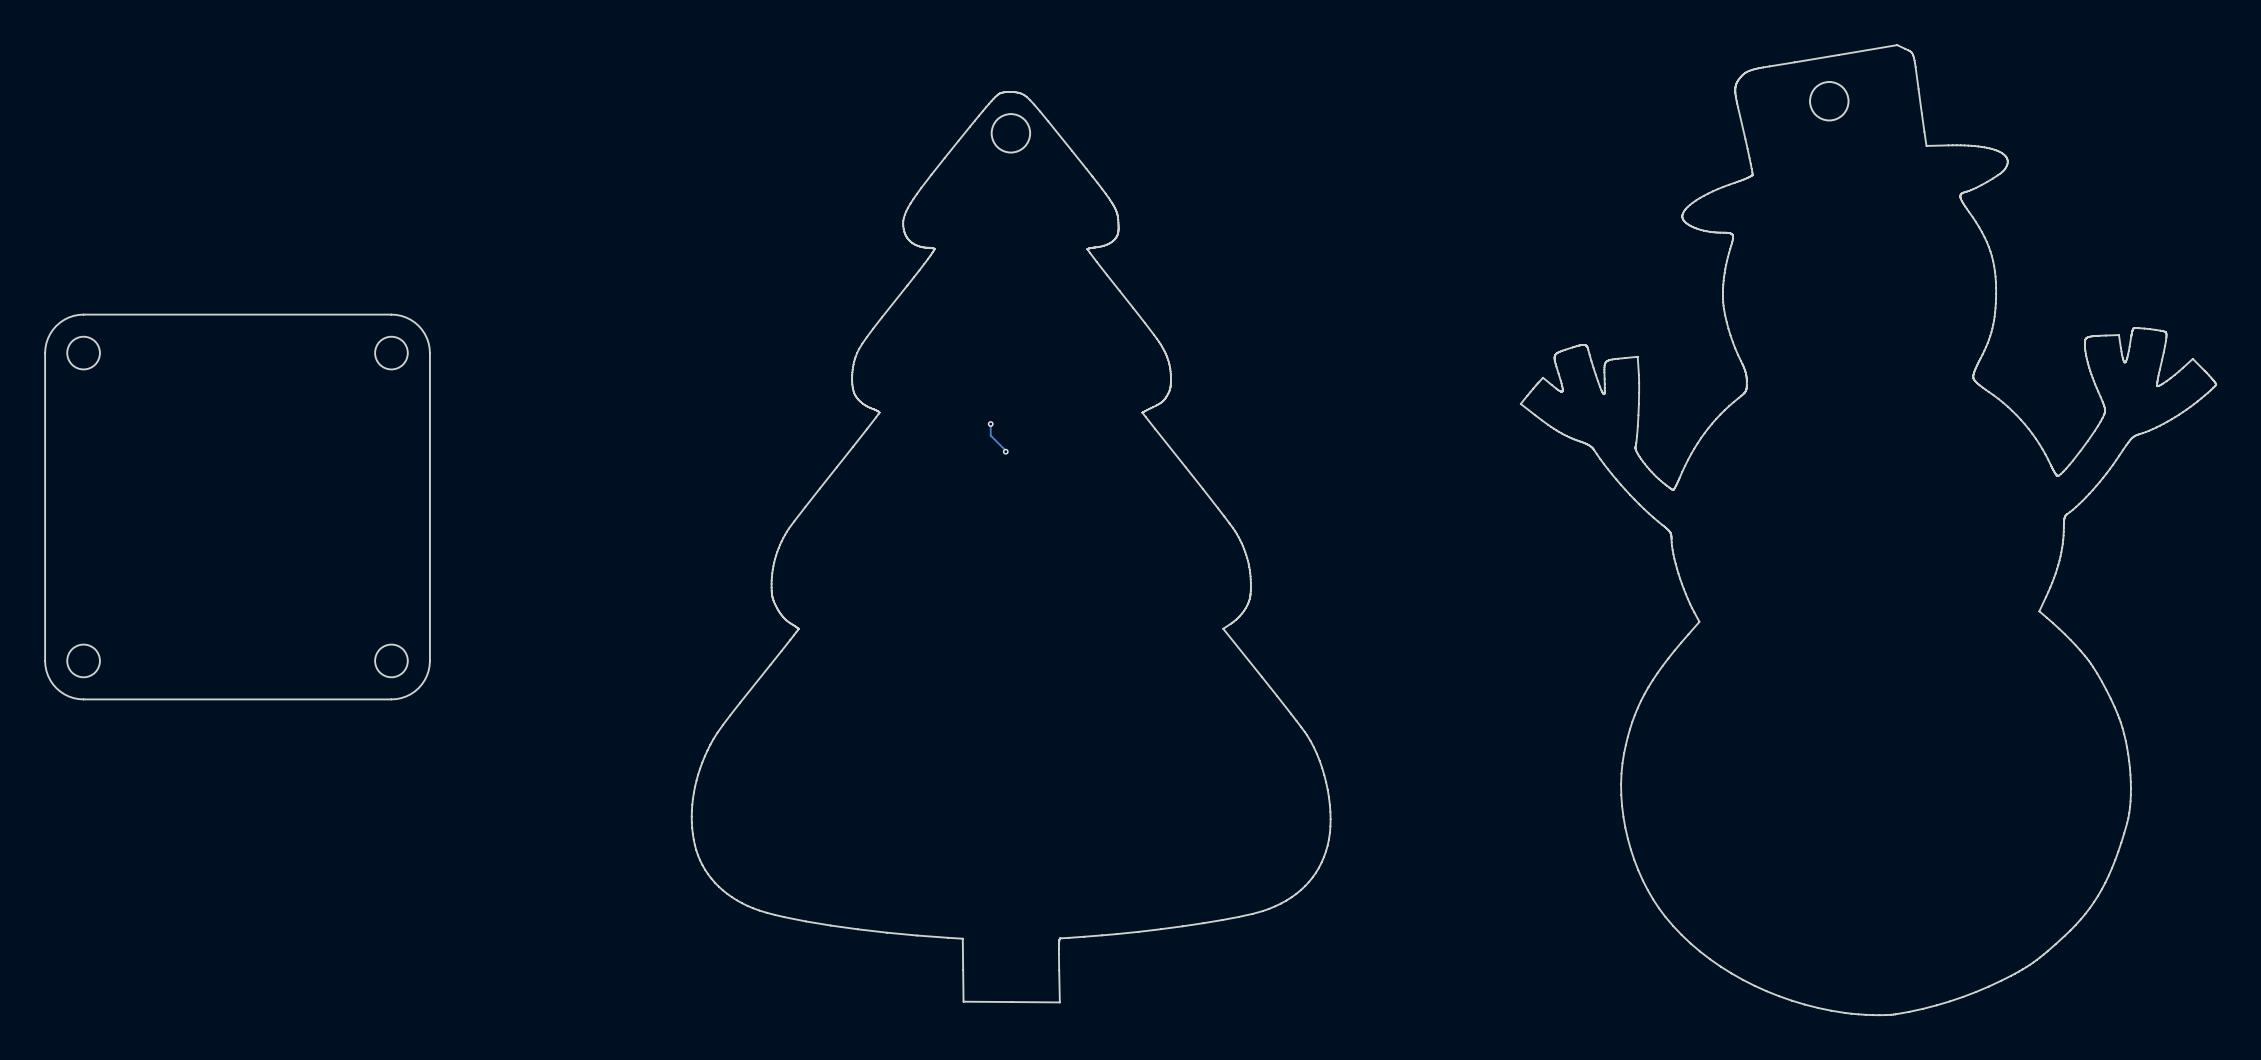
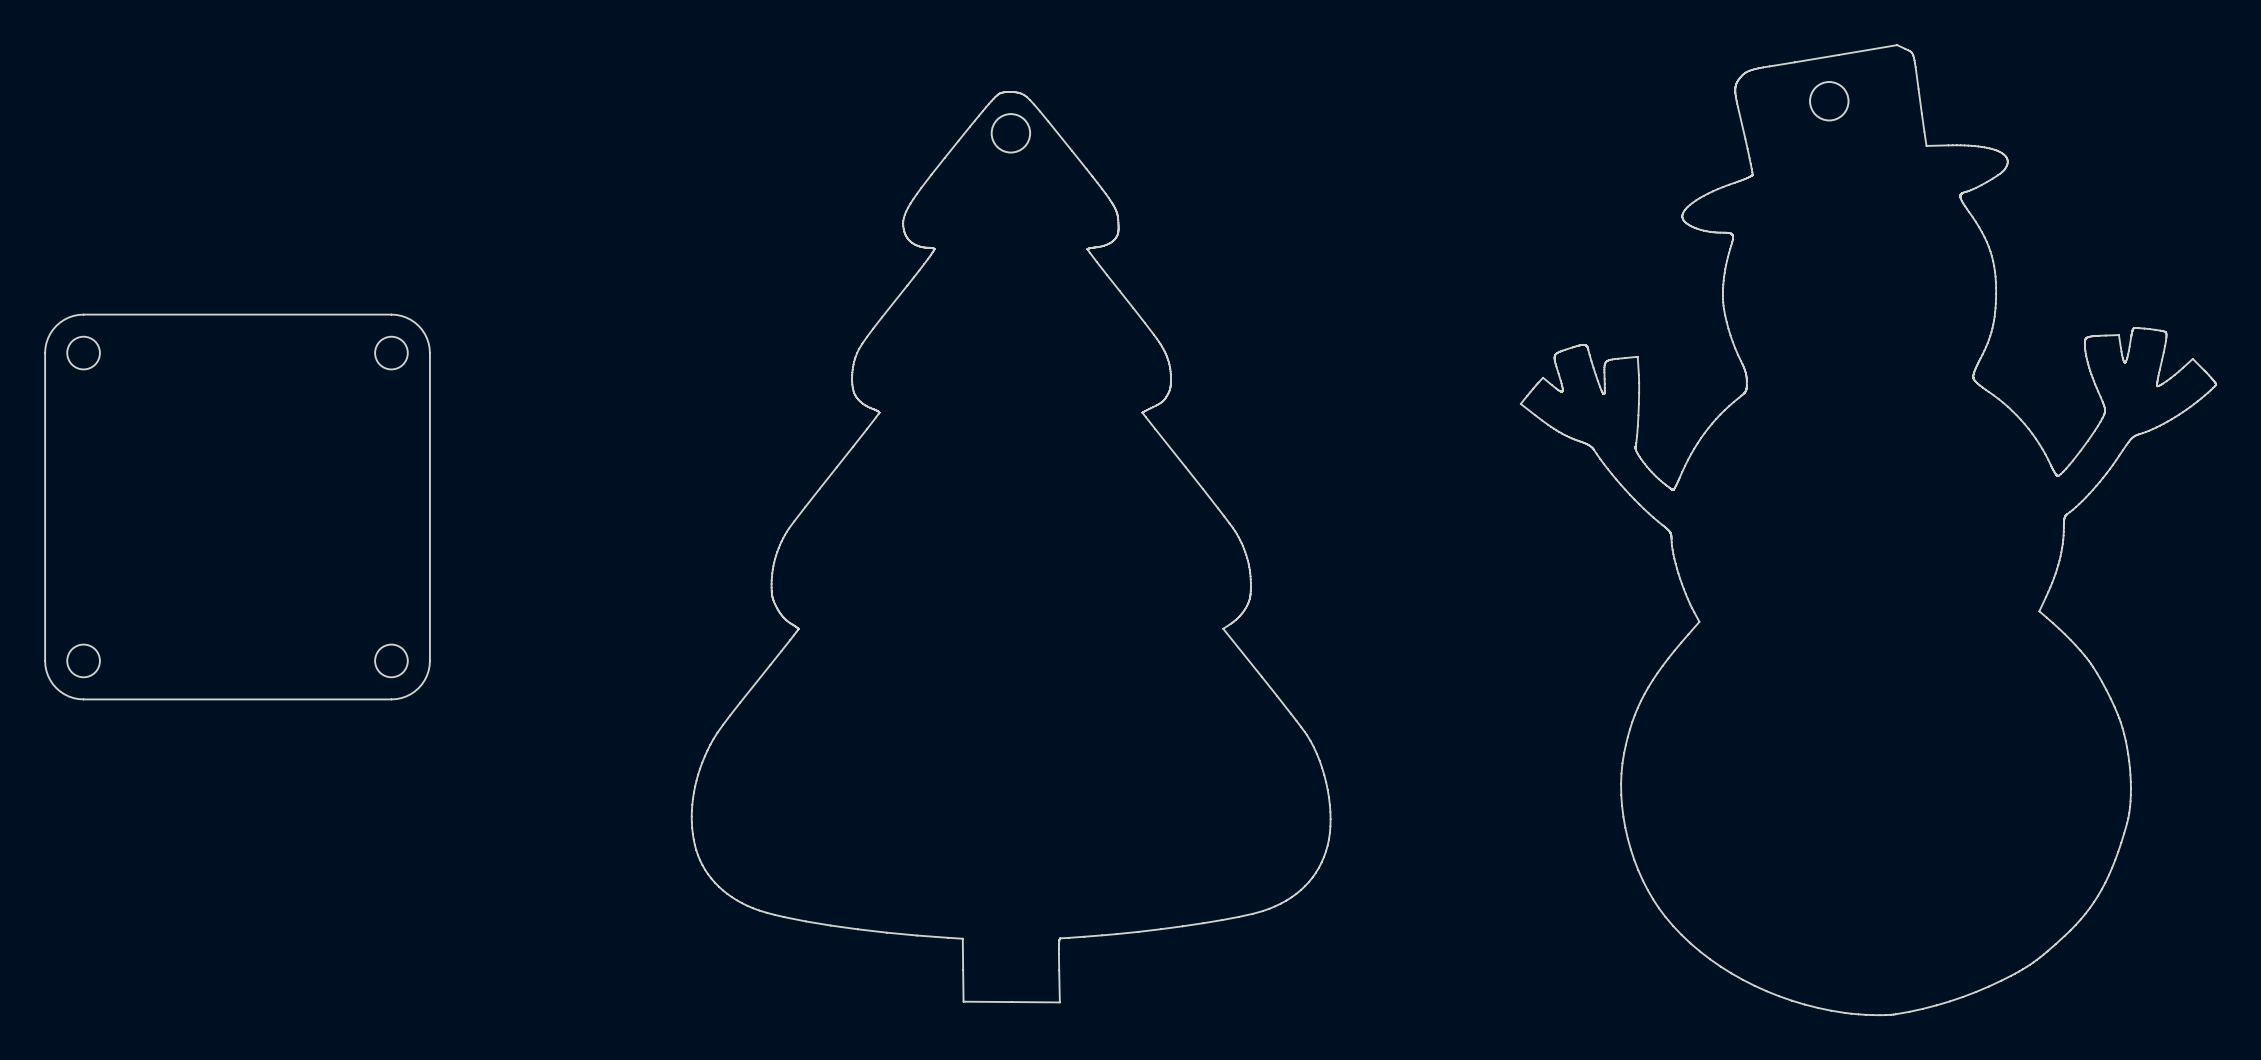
track: (990, 424) (990, 435) (1005, 451) -> none
via: (990, 424) -> none
via: (1005, 451) -> none

